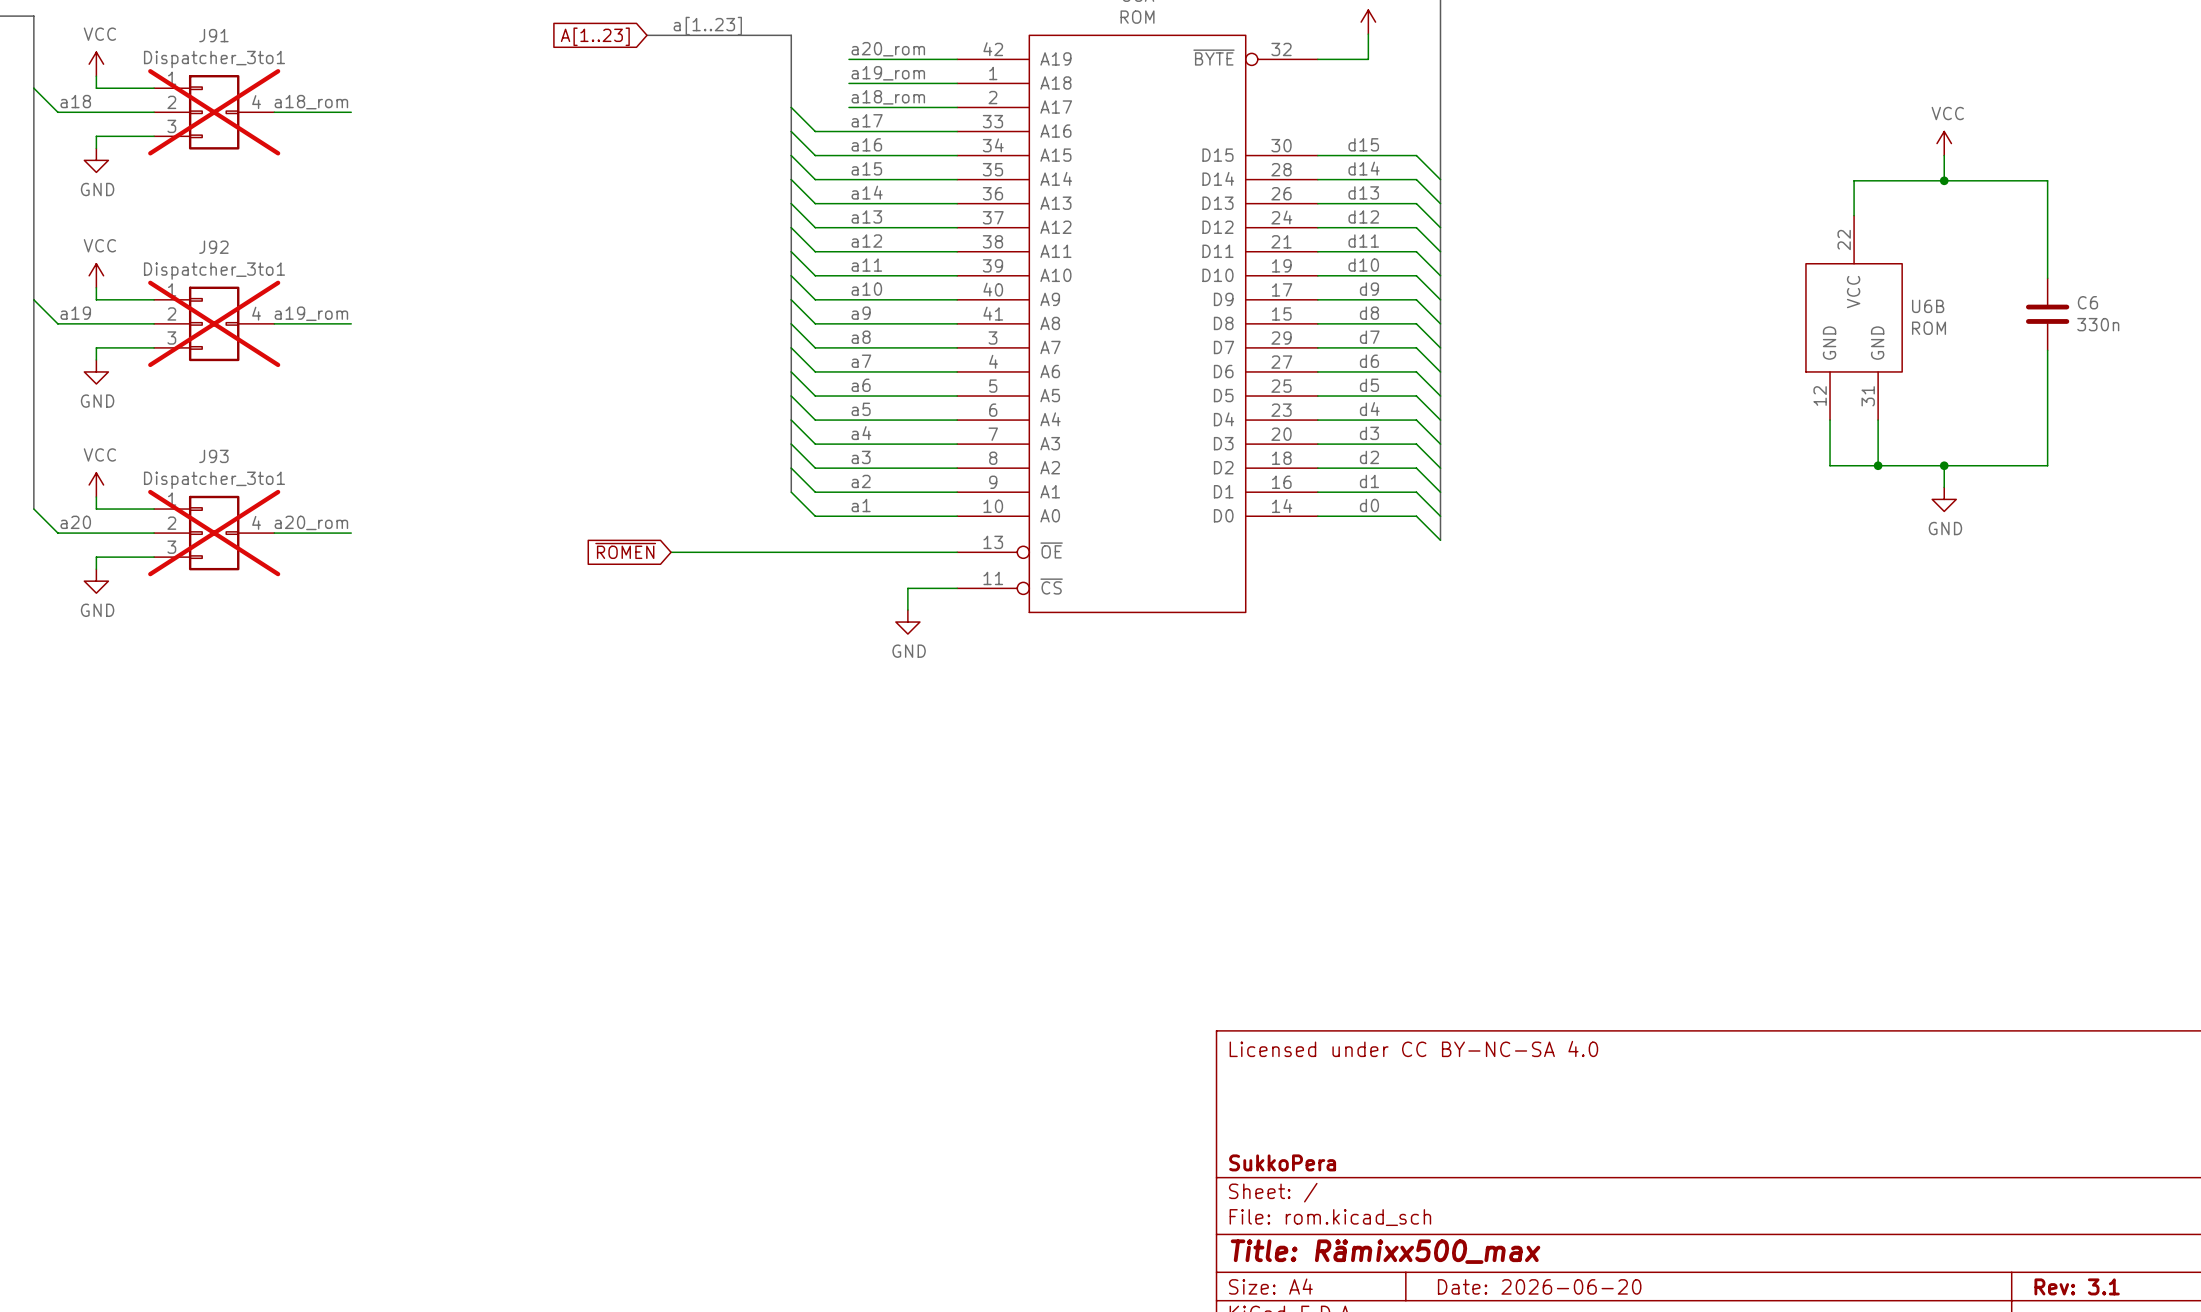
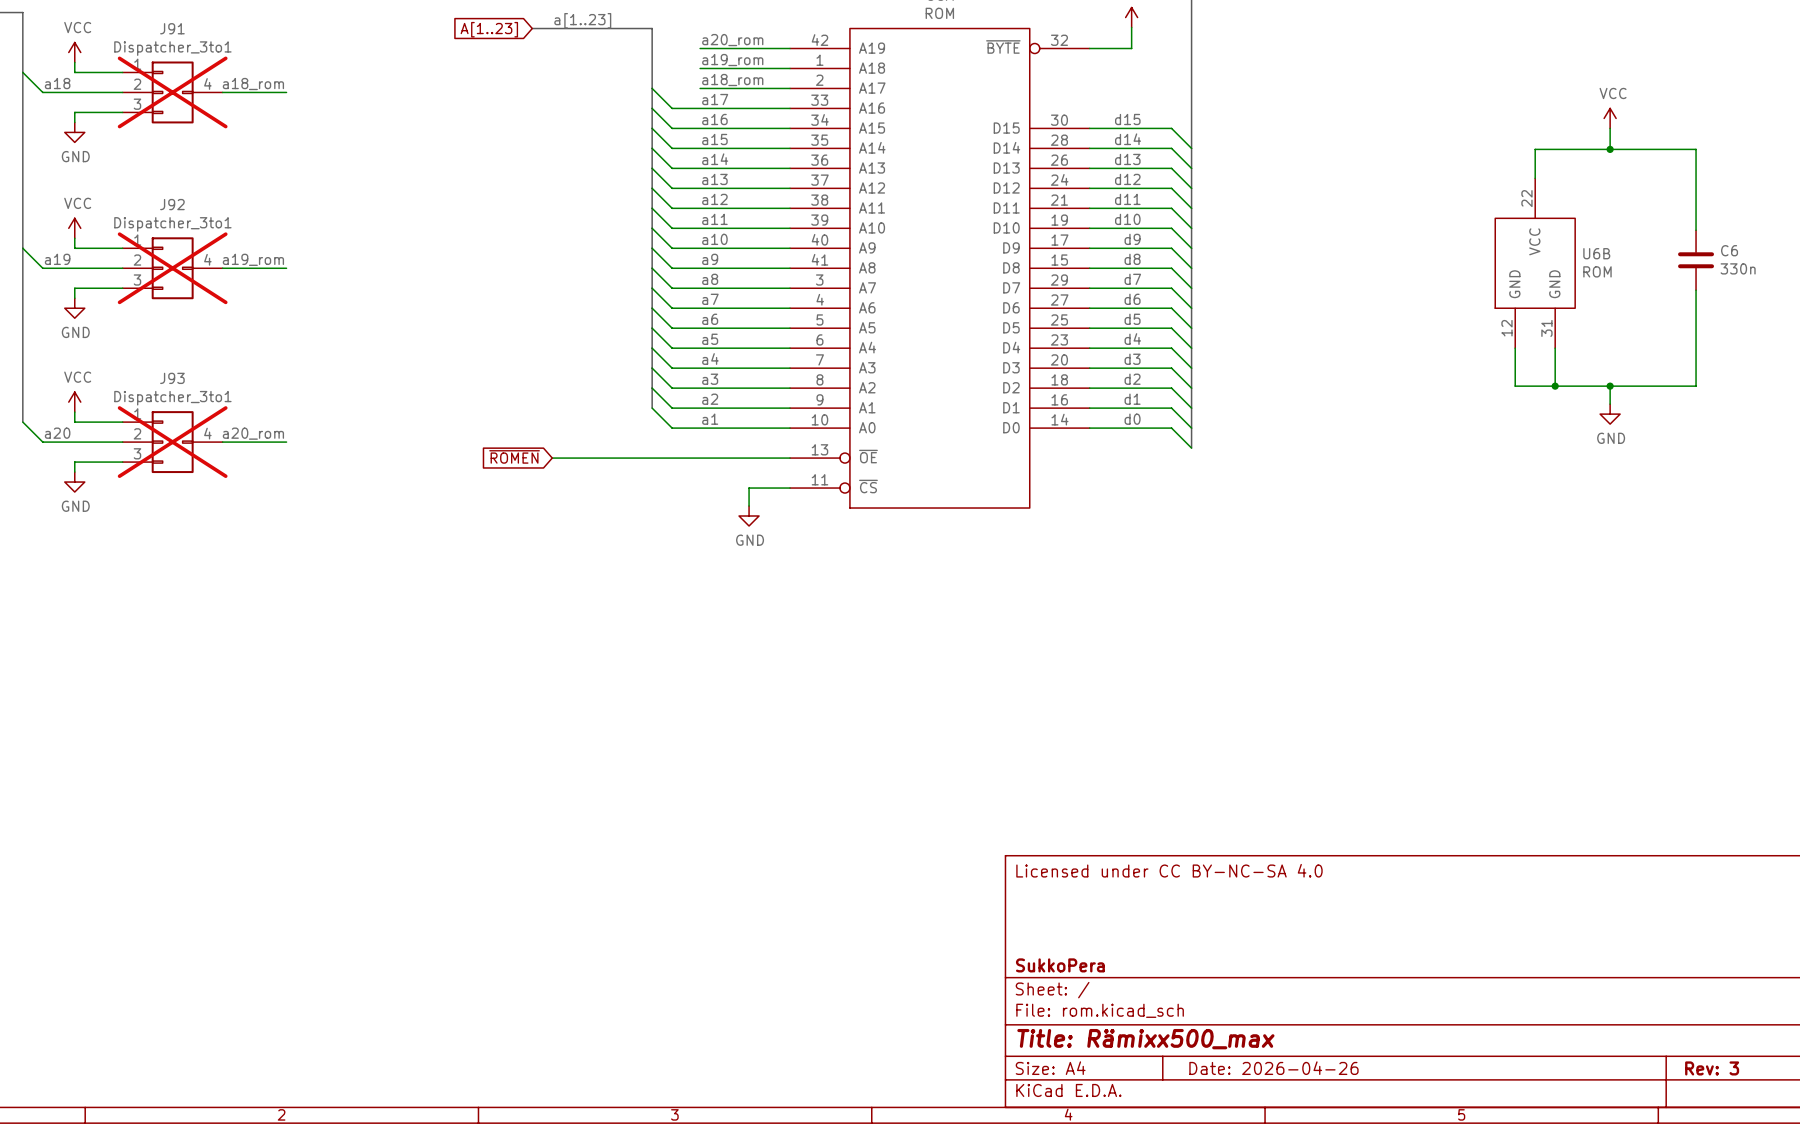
title block: Date: 2026-06-20 (1539, 1286) -> Date: 2026-04-26 (1273, 1068)
title block: Rev: 3.1 (2077, 1286) -> Rev: 3 (1712, 1068)

